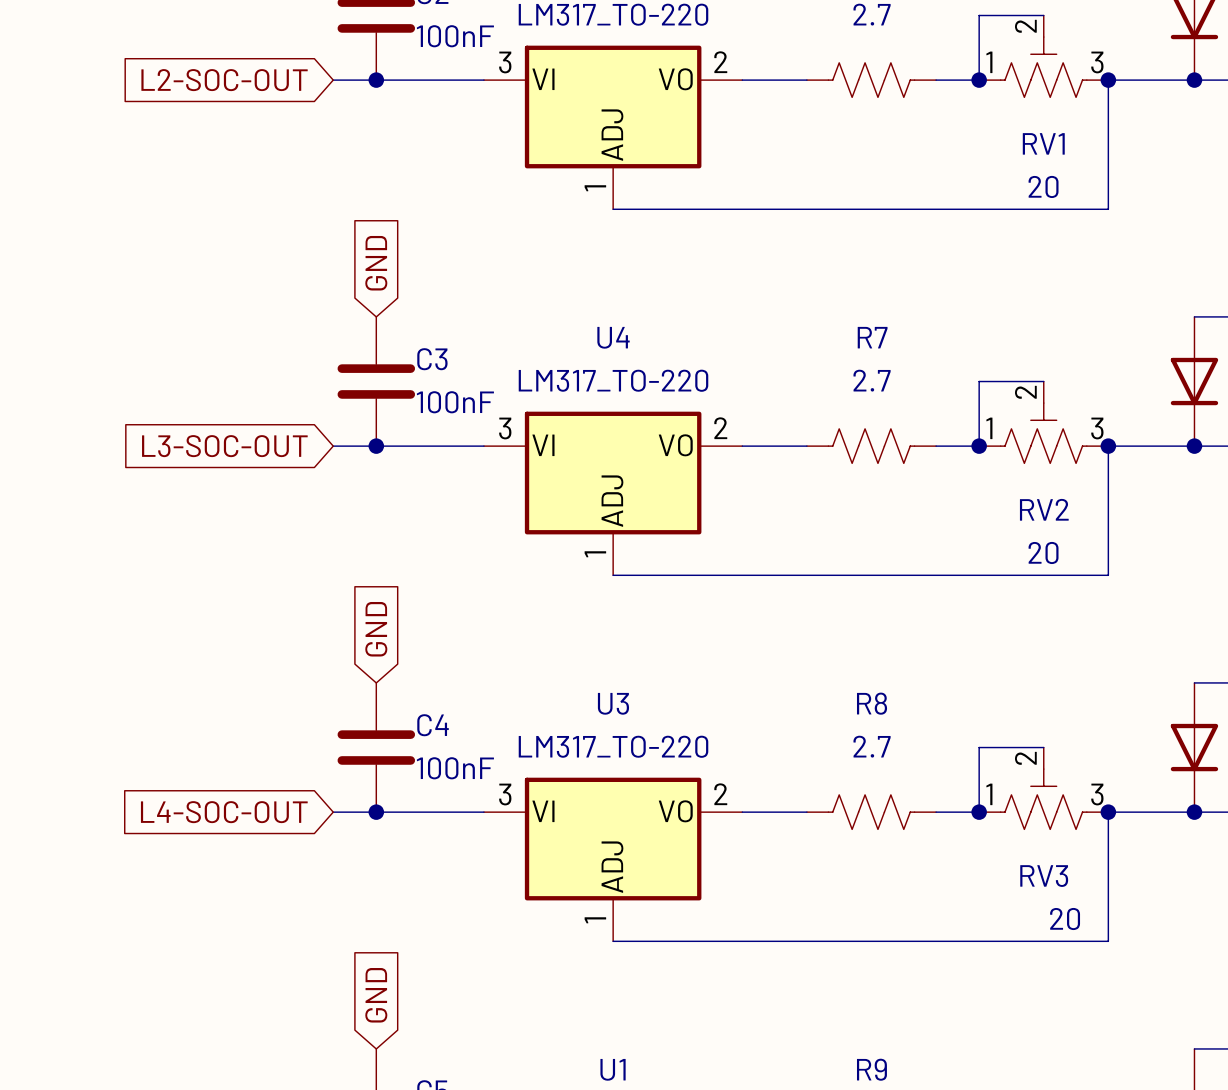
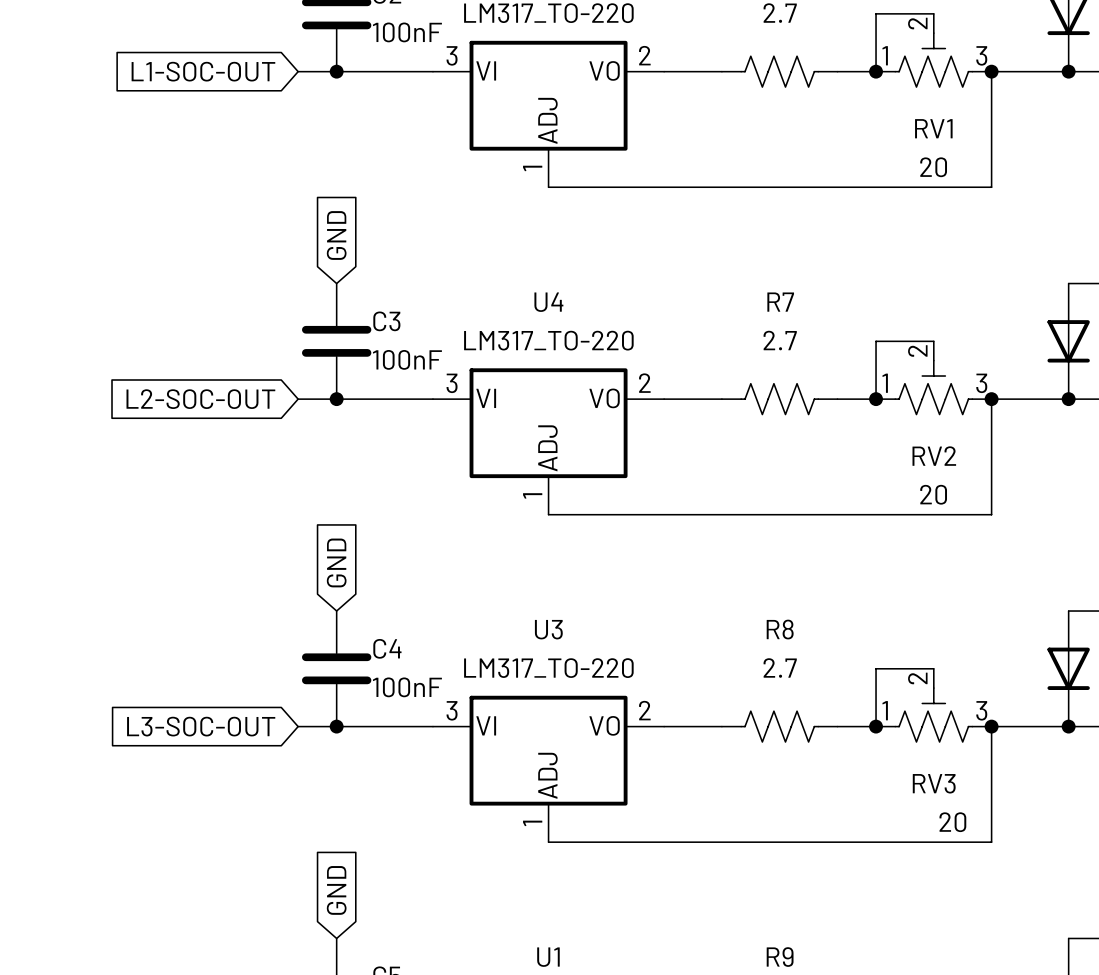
global label: L2-SOC-OUT (224, 80) -> L1-SOC-OUT (203, 71)
global label: L3-SOC-OUT (224, 446) -> L2-SOC-OUT (200, 399)
global label: L4-SOC-OUT (224, 812) -> L3-SOC-OUT (201, 726)

